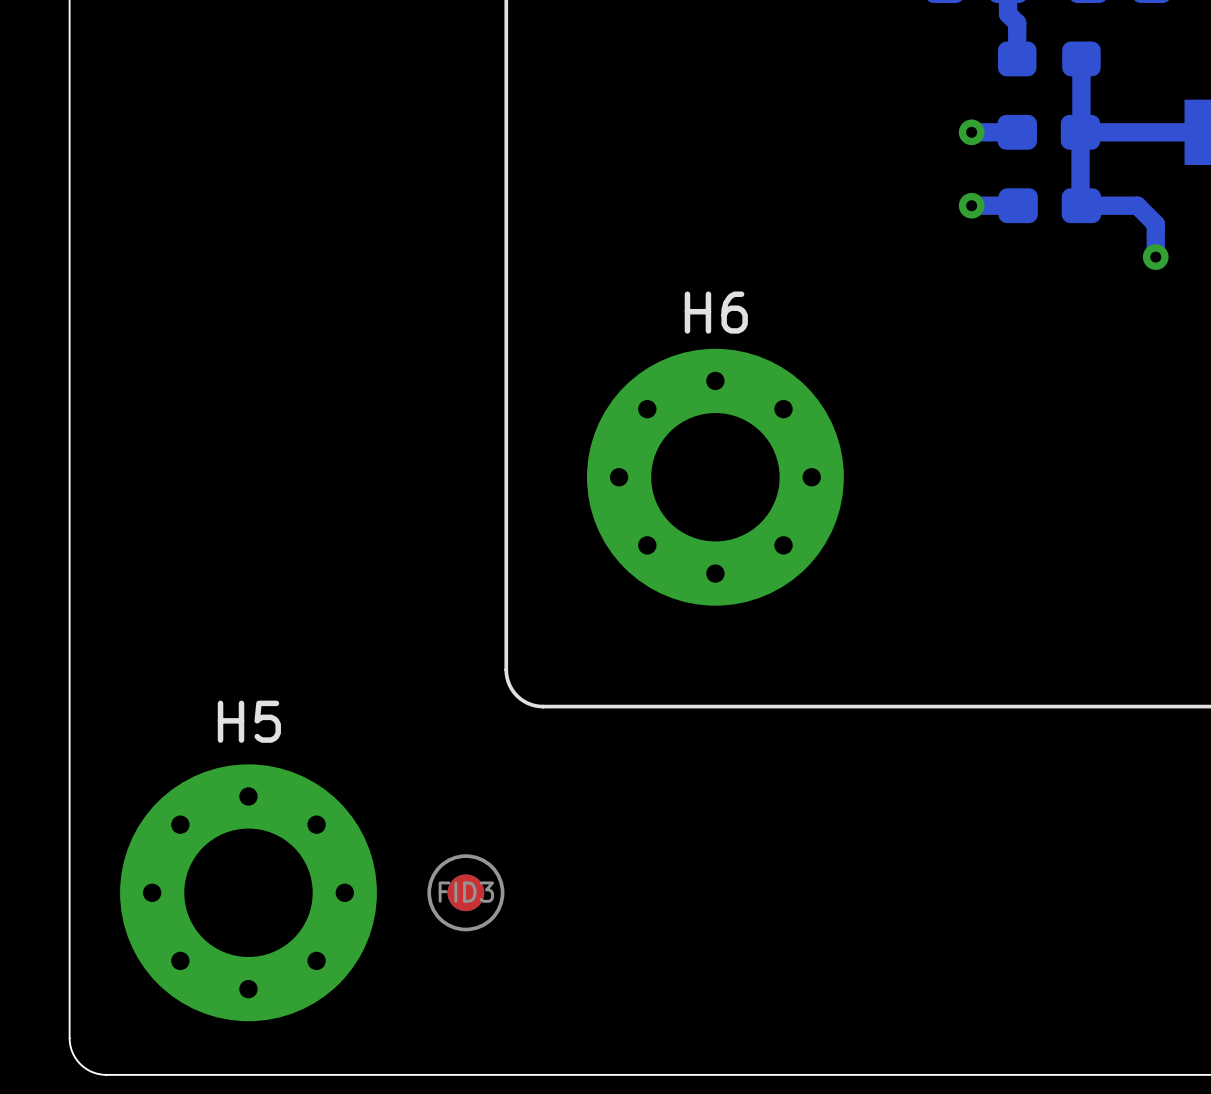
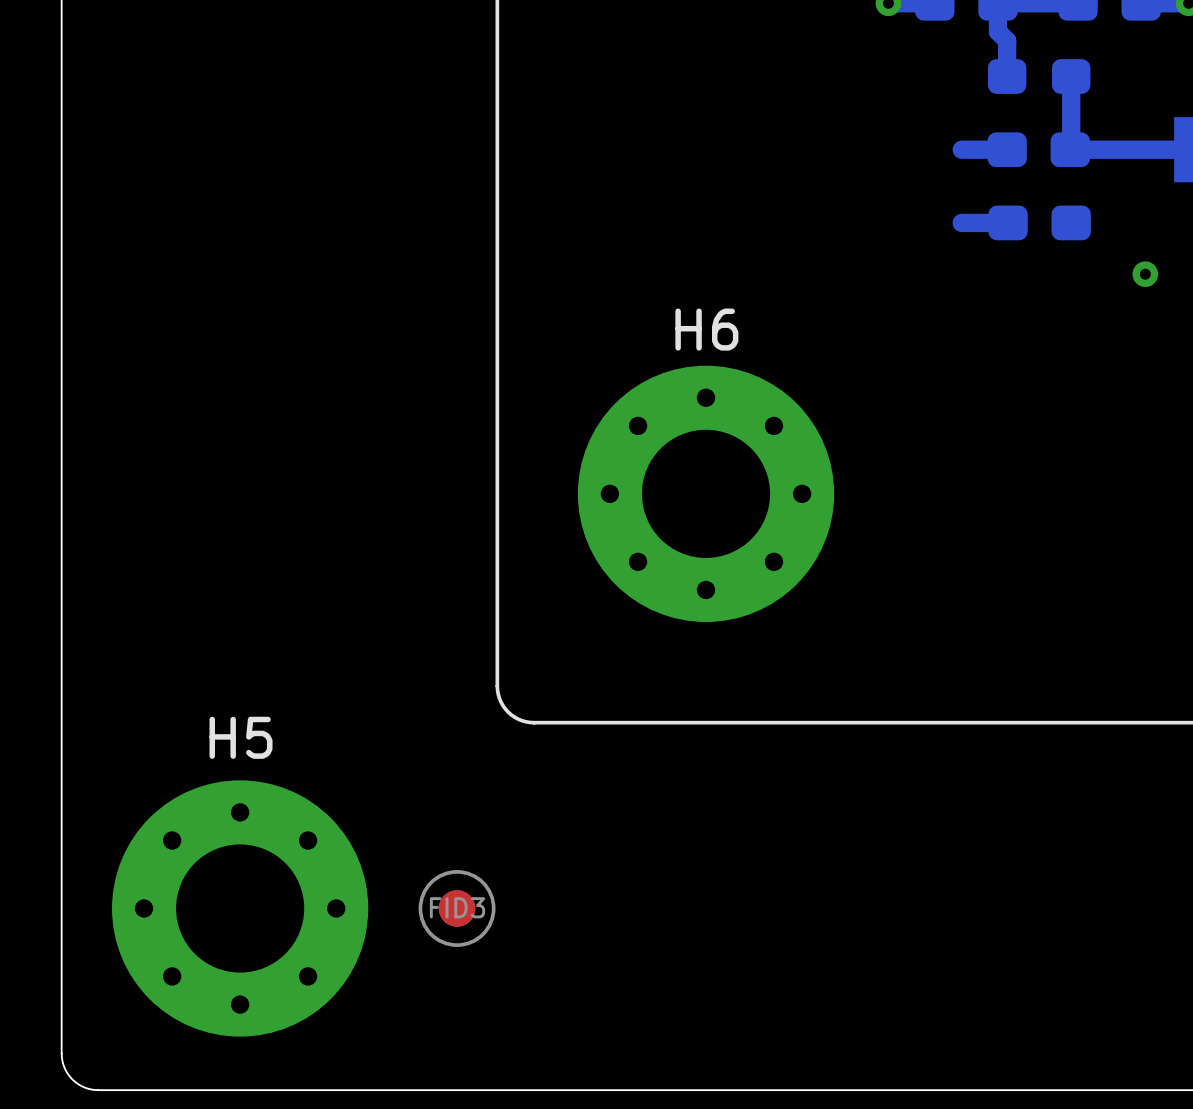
via: (971, 132) -> none
bottom track: (1080, 132) (1080, 204) (1137, 205) (1155, 224) (1155, 257) -> none
via: (971, 205) -> none

